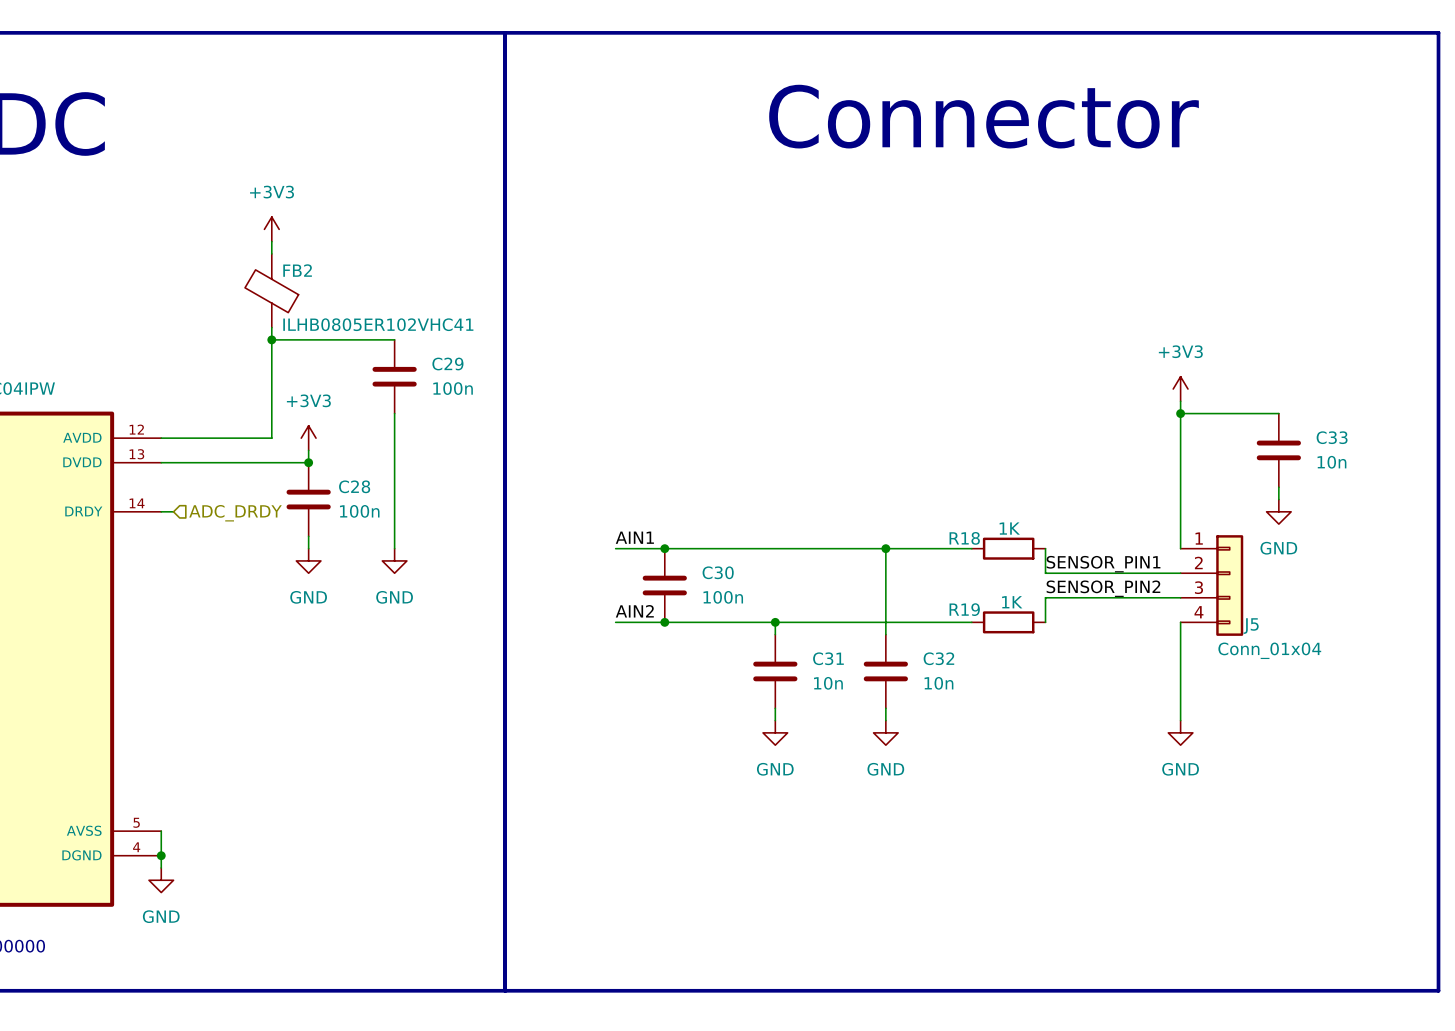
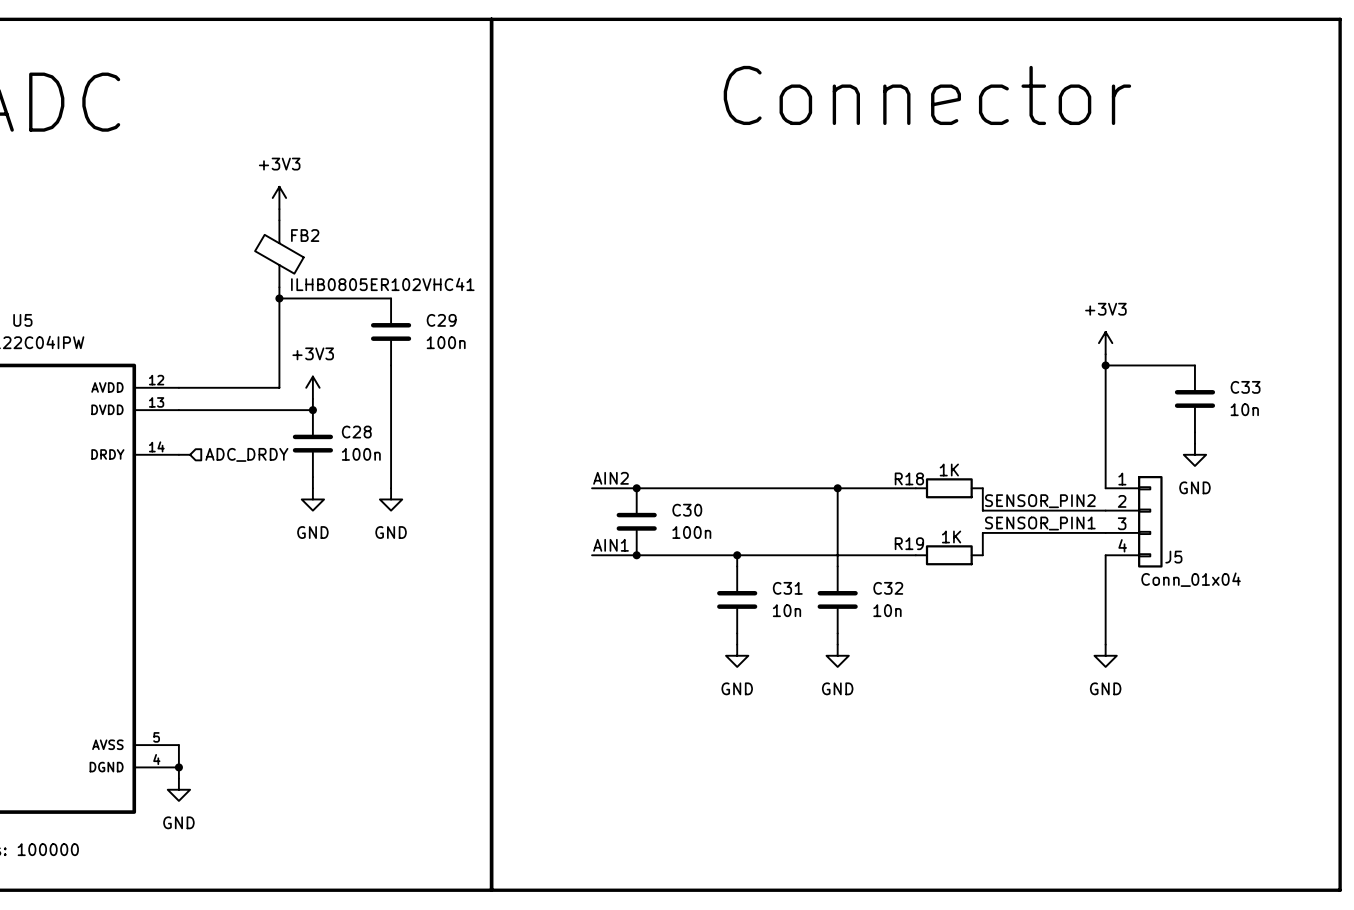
label: AIN1 (634, 537) -> AIN2 (611, 478)
label: SENSOR_PIN1 (1103, 564) -> SENSOR_PIN2 (1040, 501)
label: SENSOR_PIN2 (1103, 588) -> SENSOR_PIN1 (1040, 523)
label: AIN2 (634, 611) -> AIN1 (611, 545)

